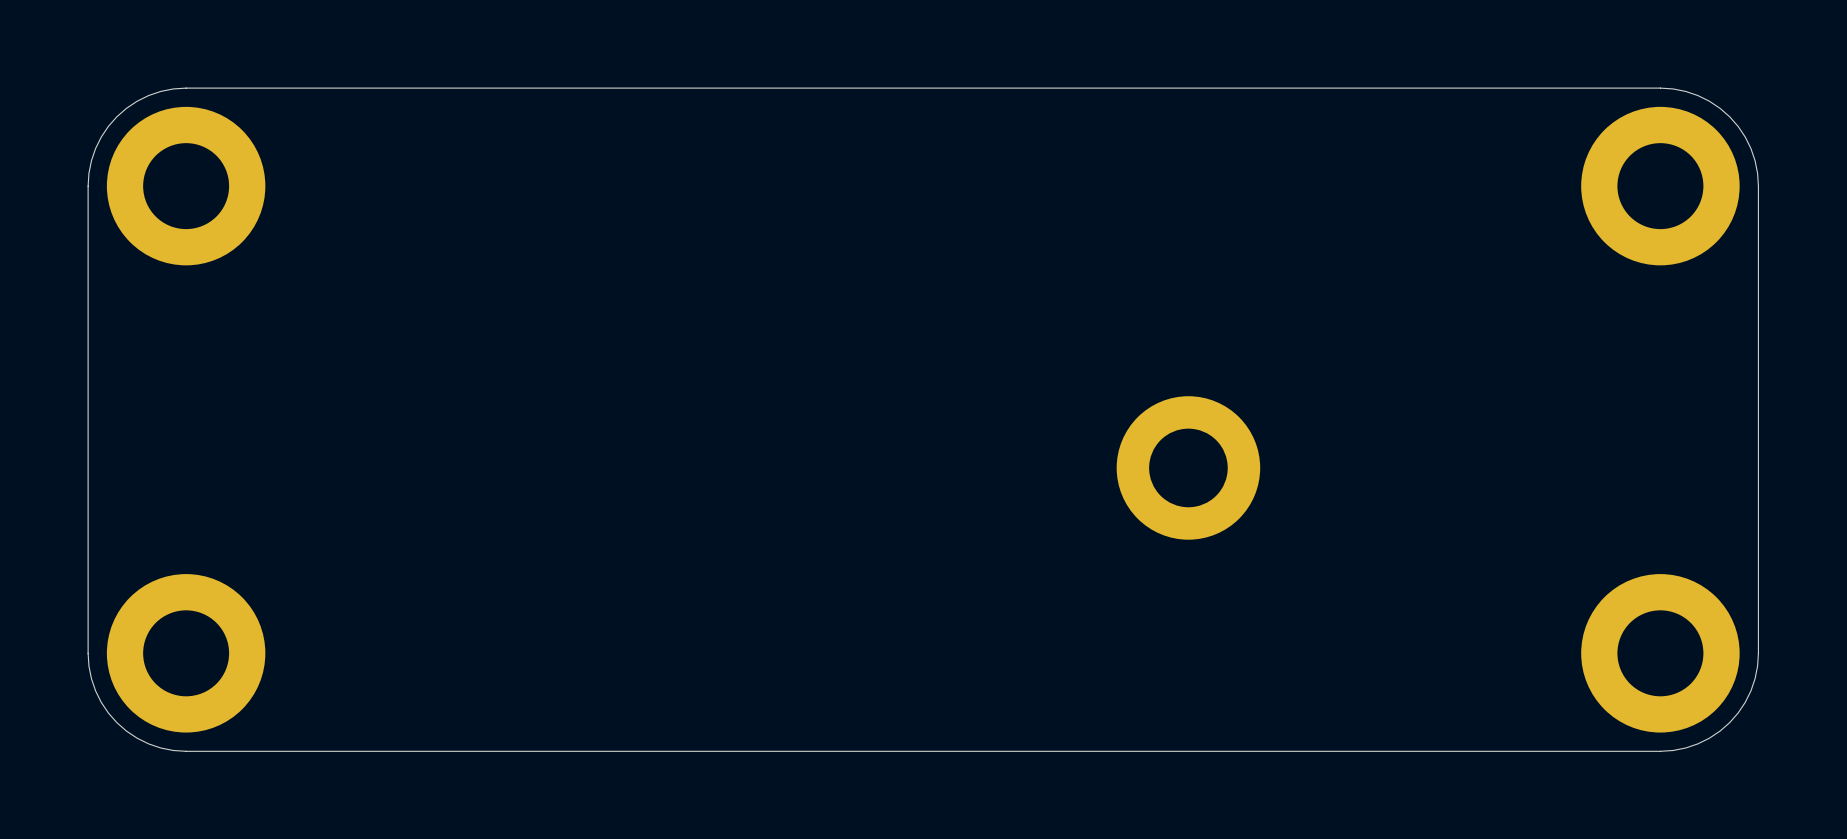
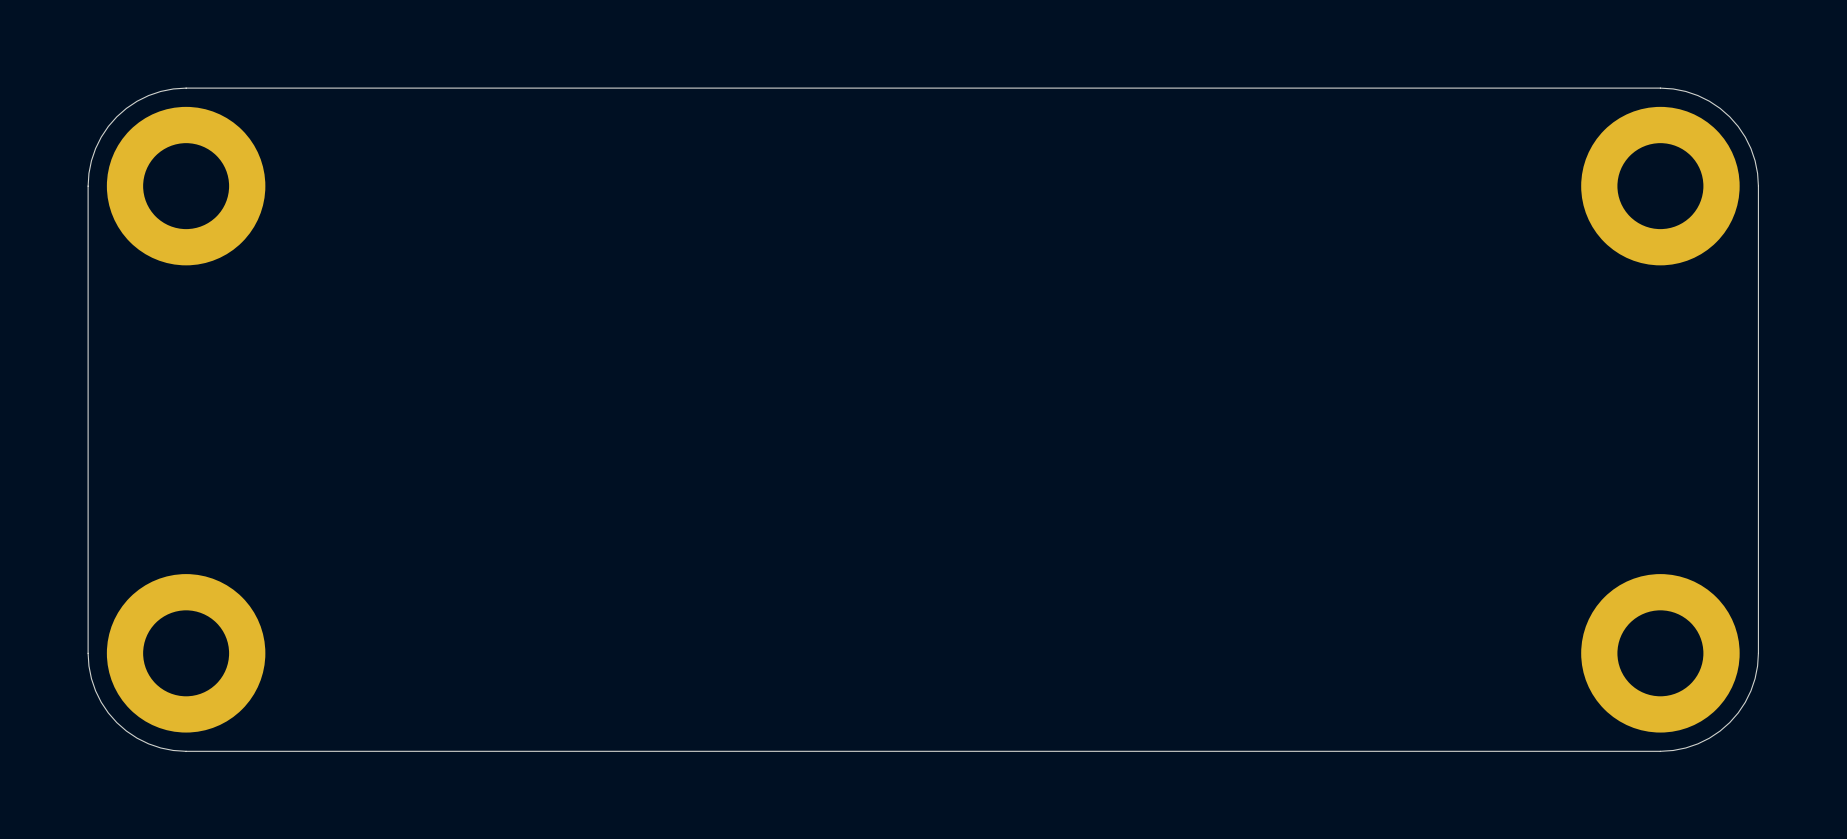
part: (1188, 467) -> none

